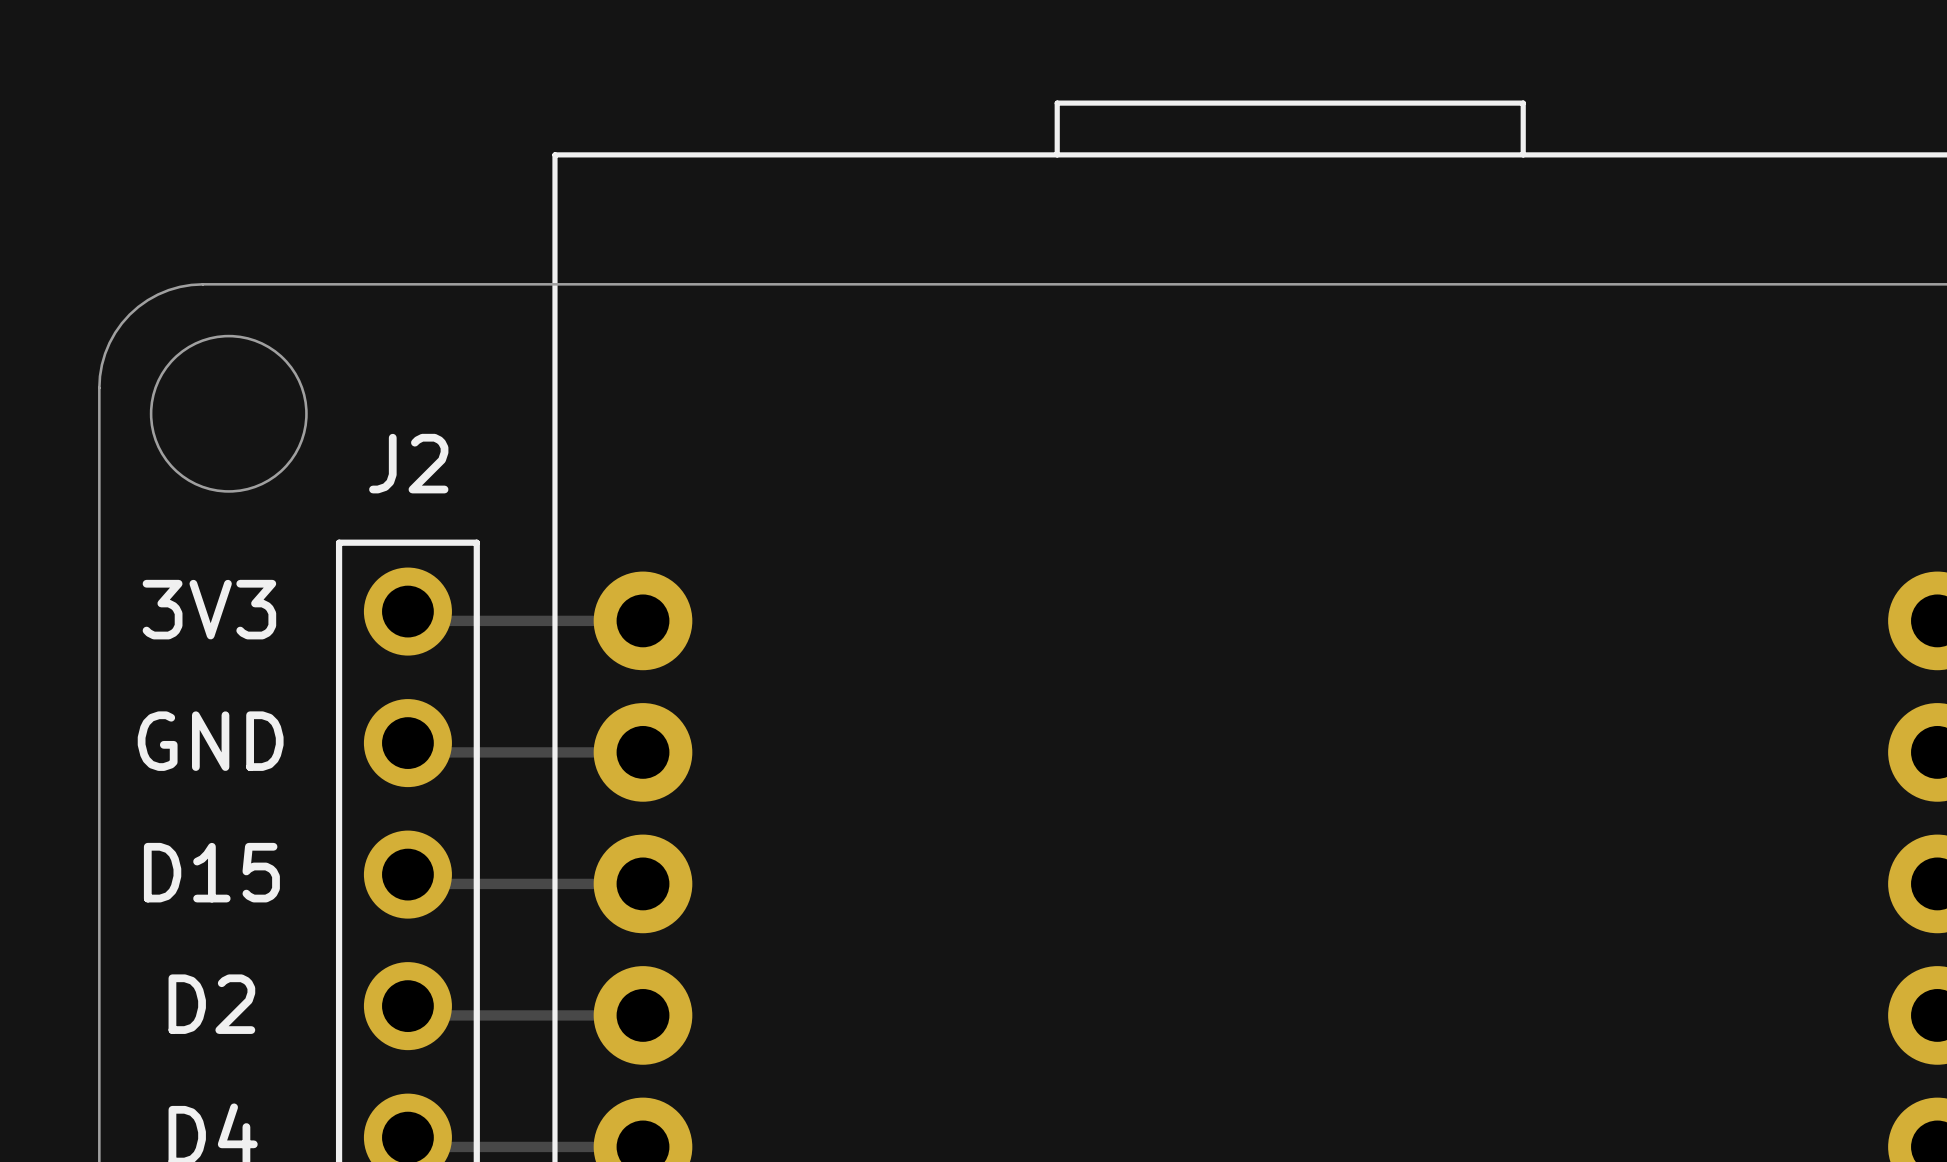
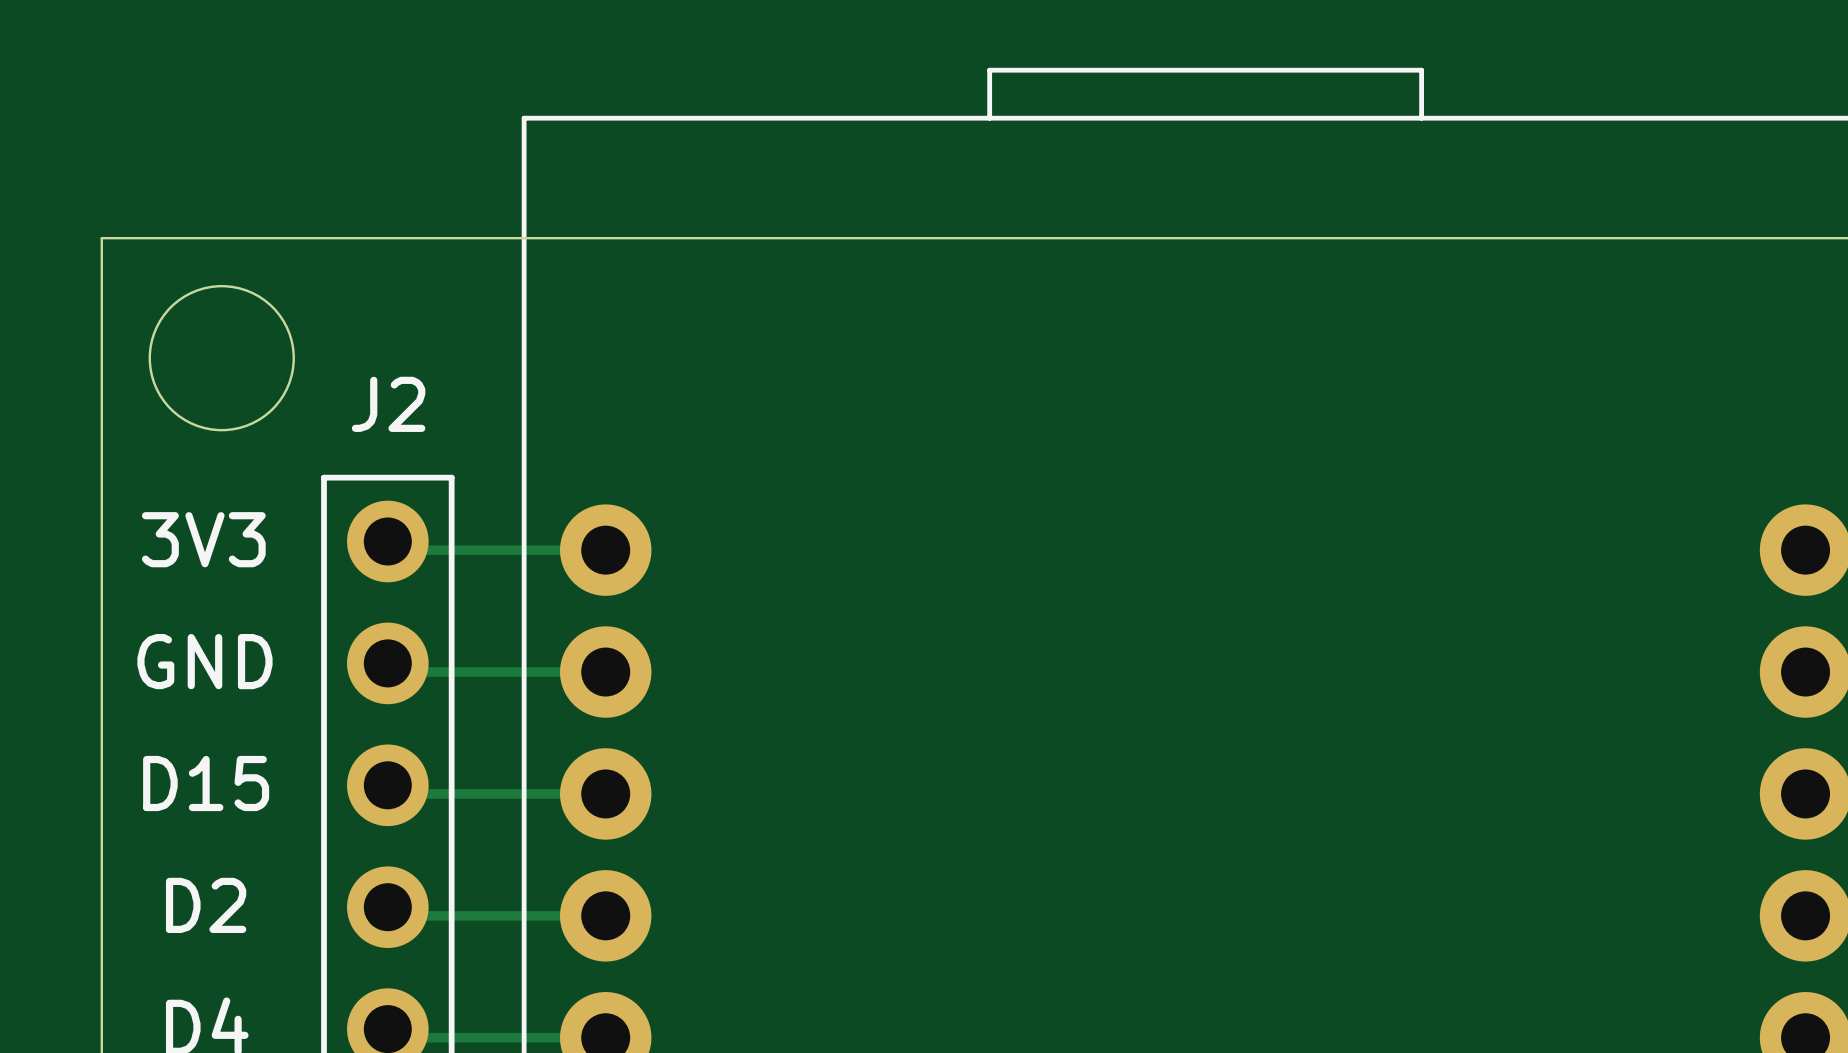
board edge: (202, 284) (168, 290) (147, 300) (129, 314) (115, 332) (105, 353) (99, 387) -> (197, 238) (101, 238) (101, 334)

